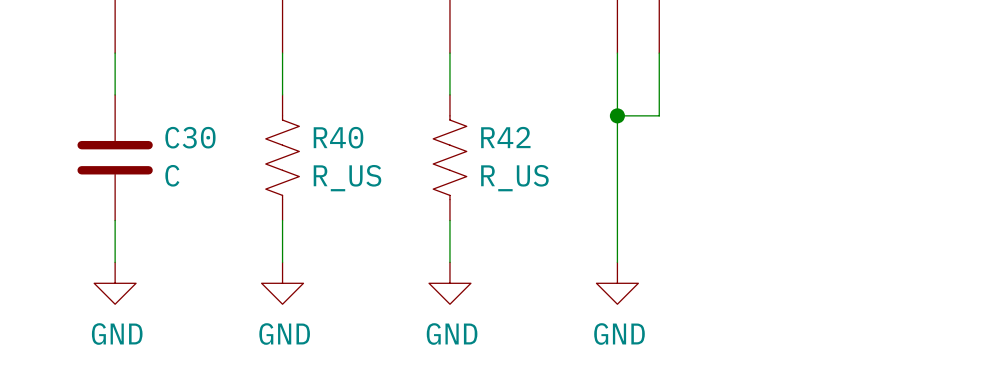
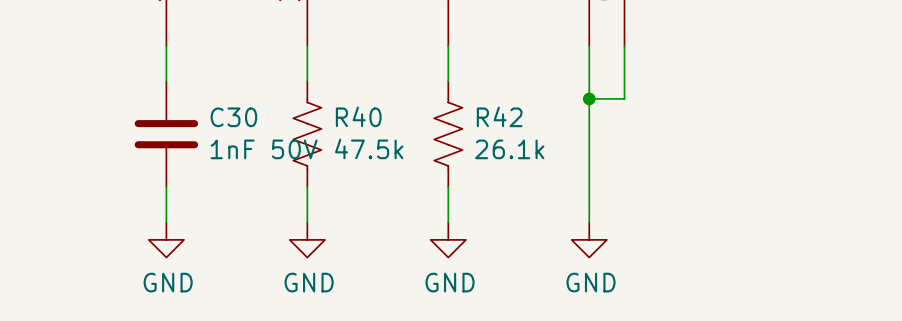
C30 value: C (172, 175) -> 1nF 50V (264, 149)
R40 value: R_US (347, 178) -> 47.5k (369, 148)
R42 value: R_US (514, 178) -> 26.1k (509, 149)

